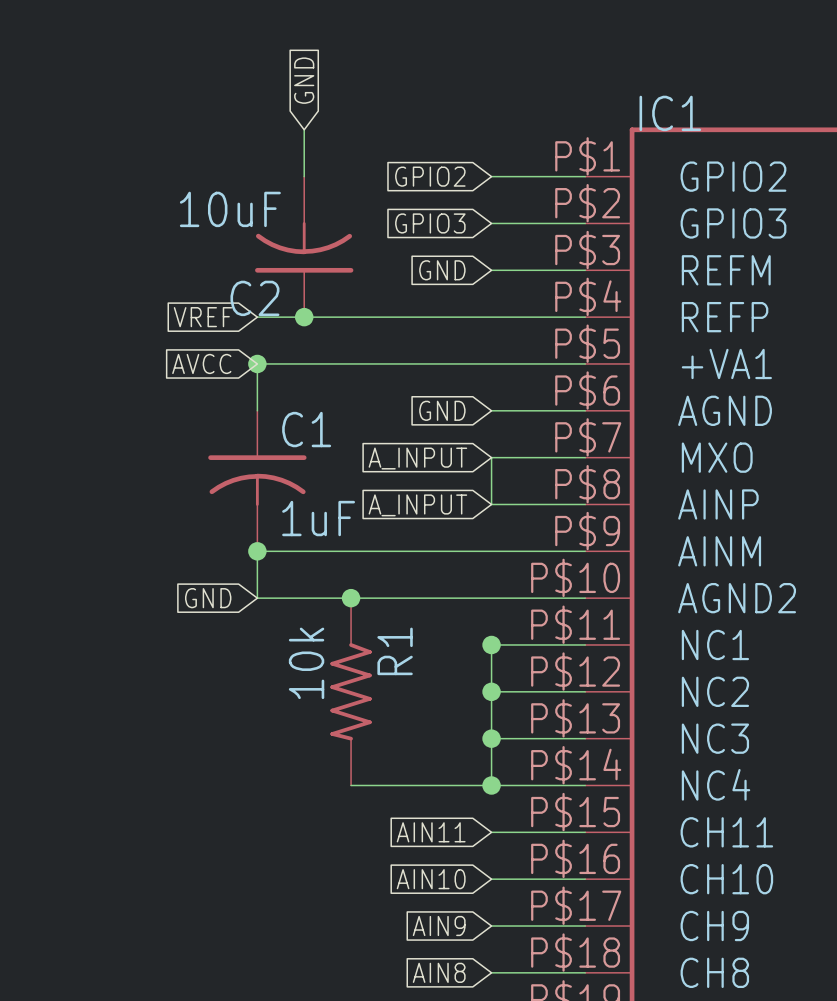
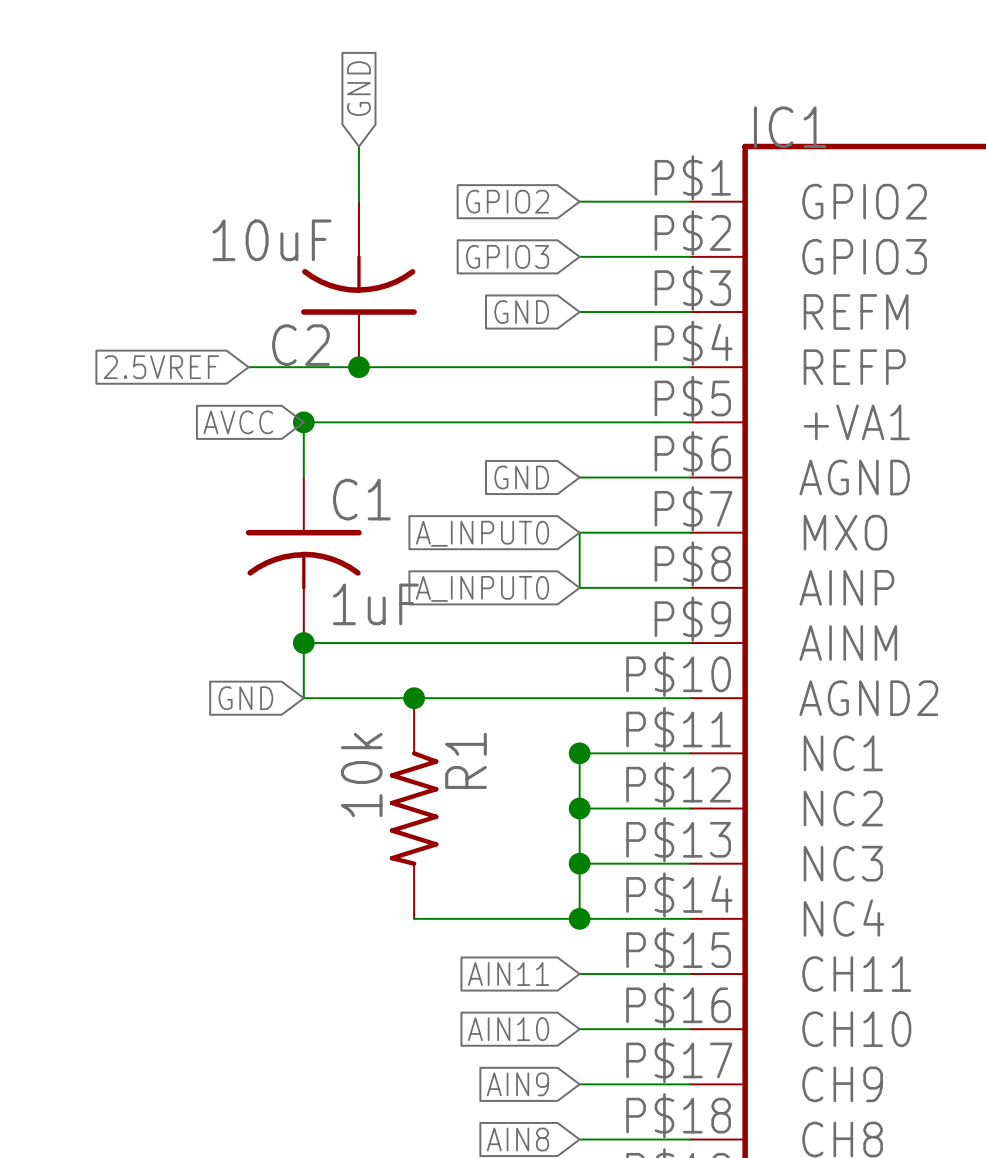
global label: VREF (203, 317) -> 2.5VREF (161, 367)
wire: none -> (248, 367) (303, 367)
global label: A_INPUT (417, 458) -> A_INPUT0 (482, 533)
global label: A_INPUT (417, 505) -> A_INPUT0 (482, 588)

